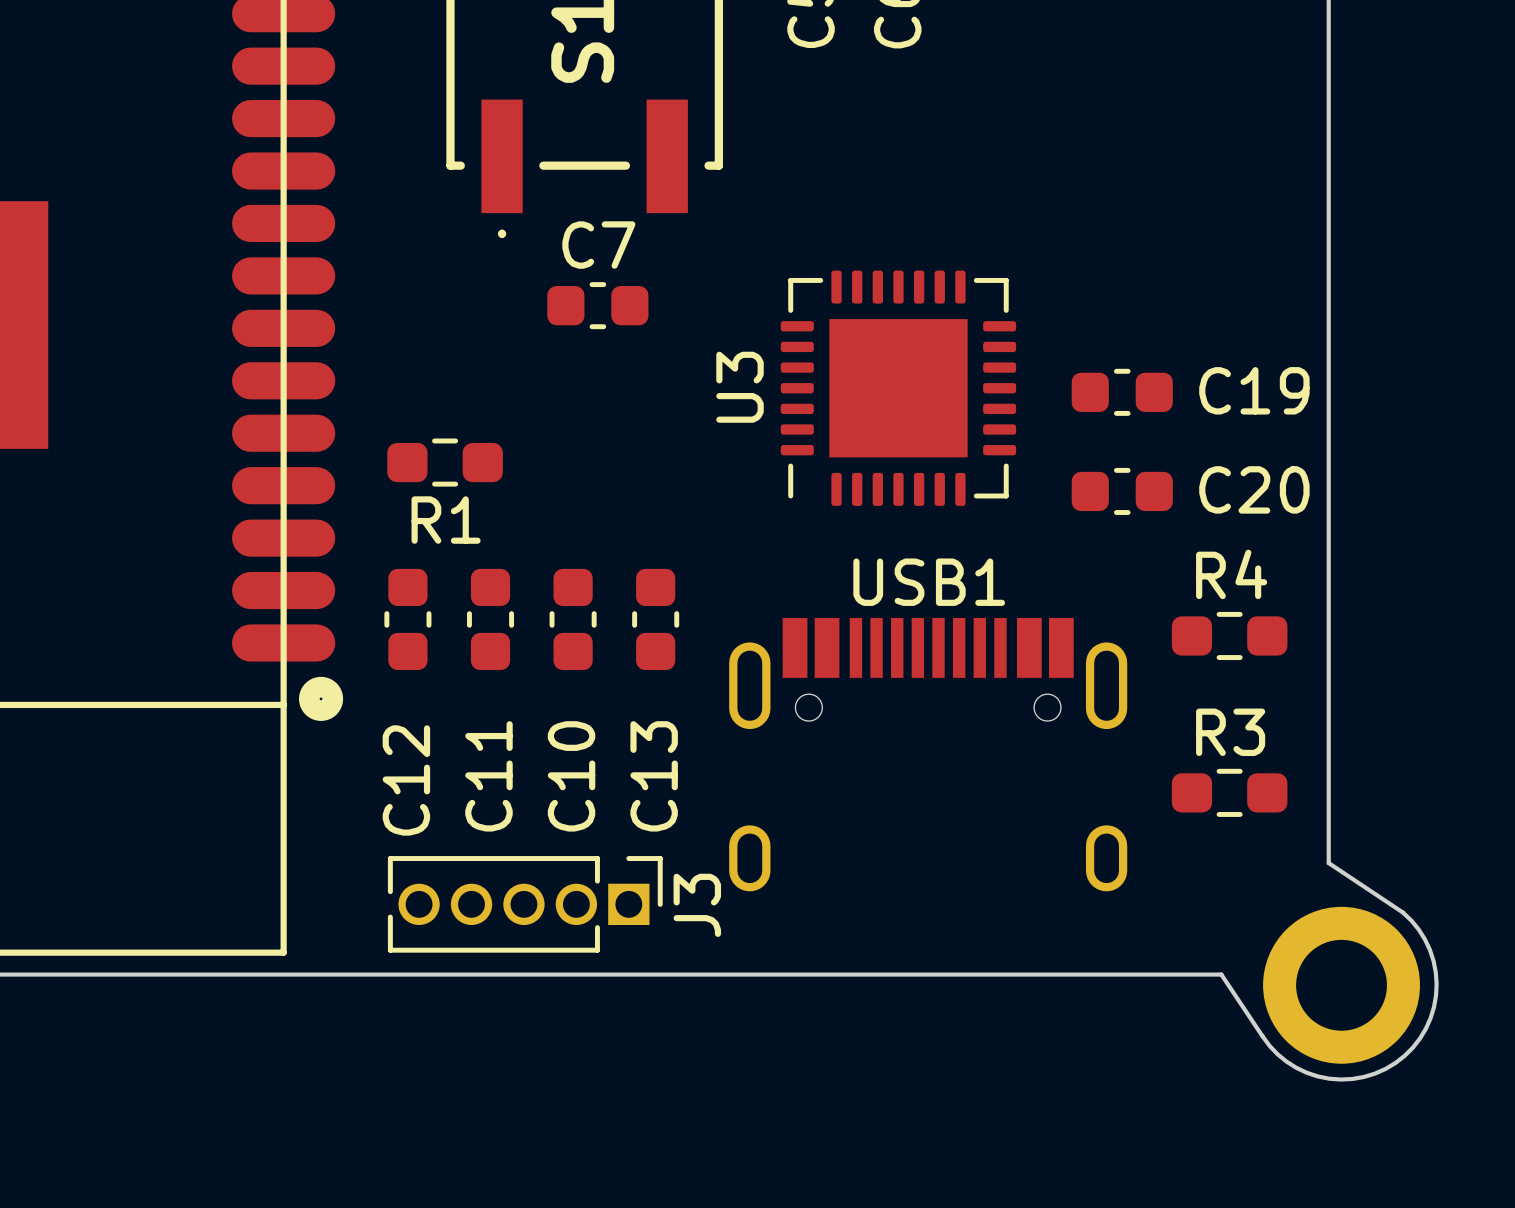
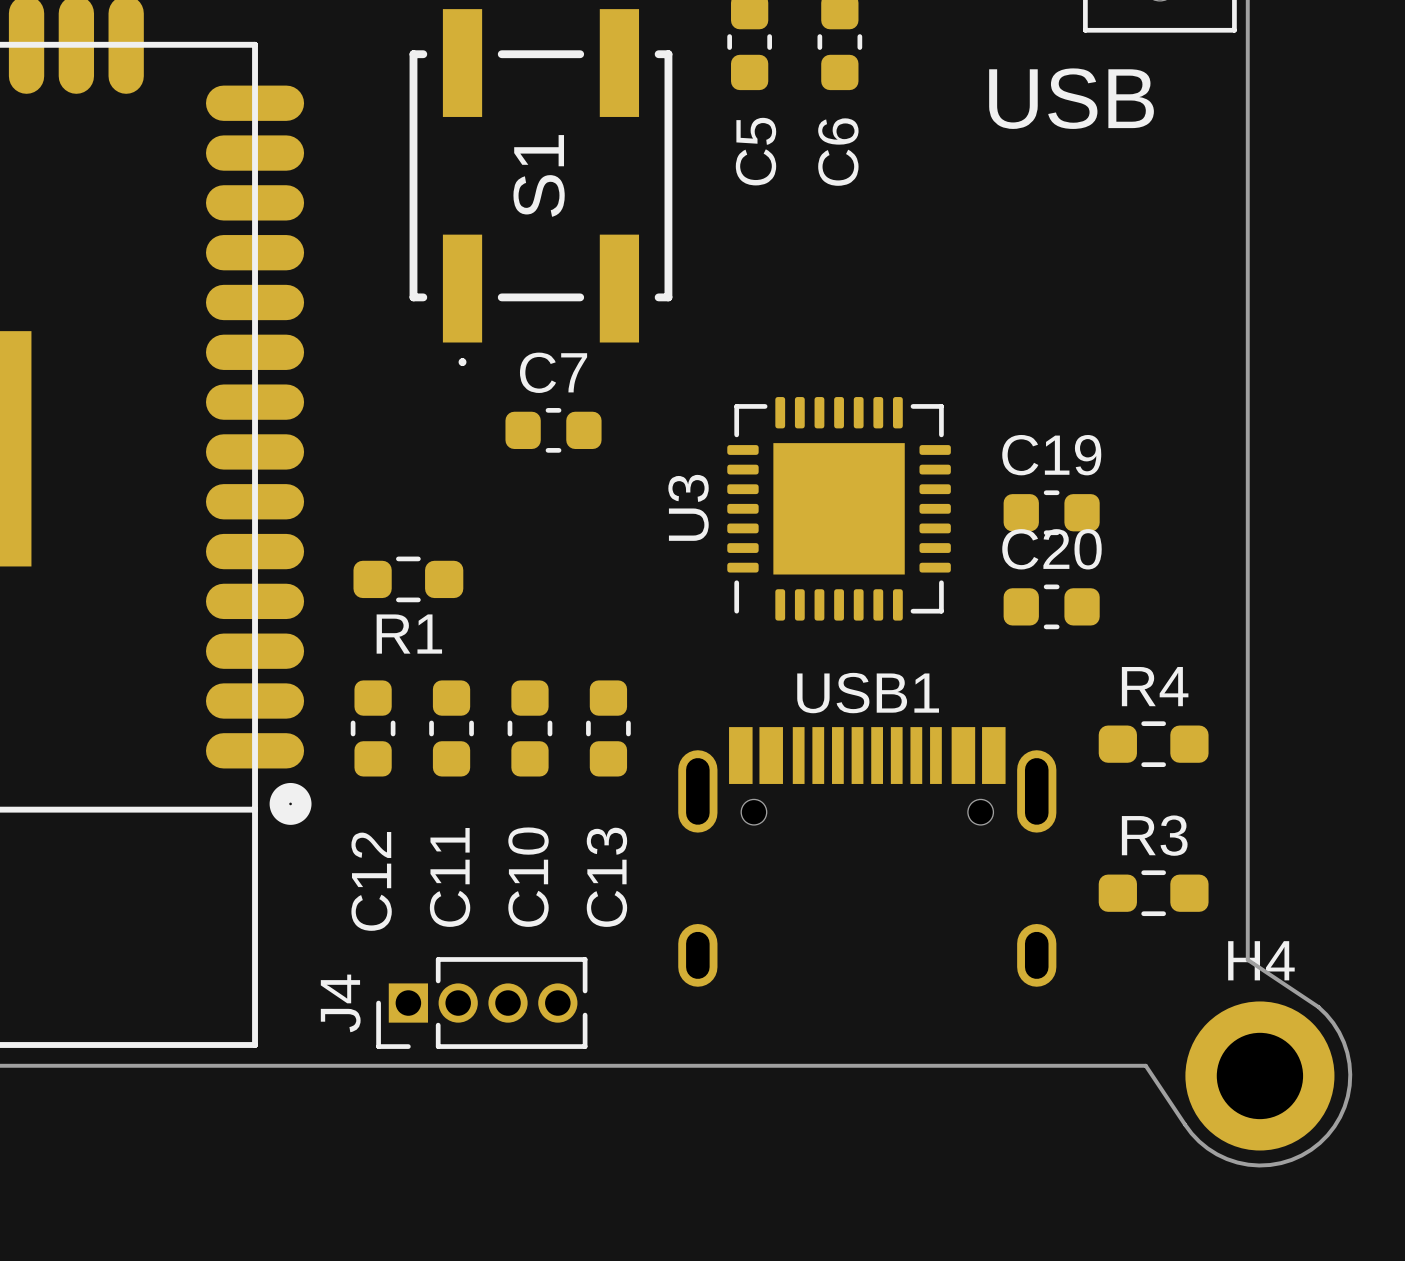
C19 name position: C19 (1254, 390) -> C19 (1051, 455)
C20 name position: C20 (1254, 489) -> C20 (1051, 549)
H4 name: none -> H4 (1261, 960)
J3: (525, 904) -> none
J4: none -> (481, 1003)

